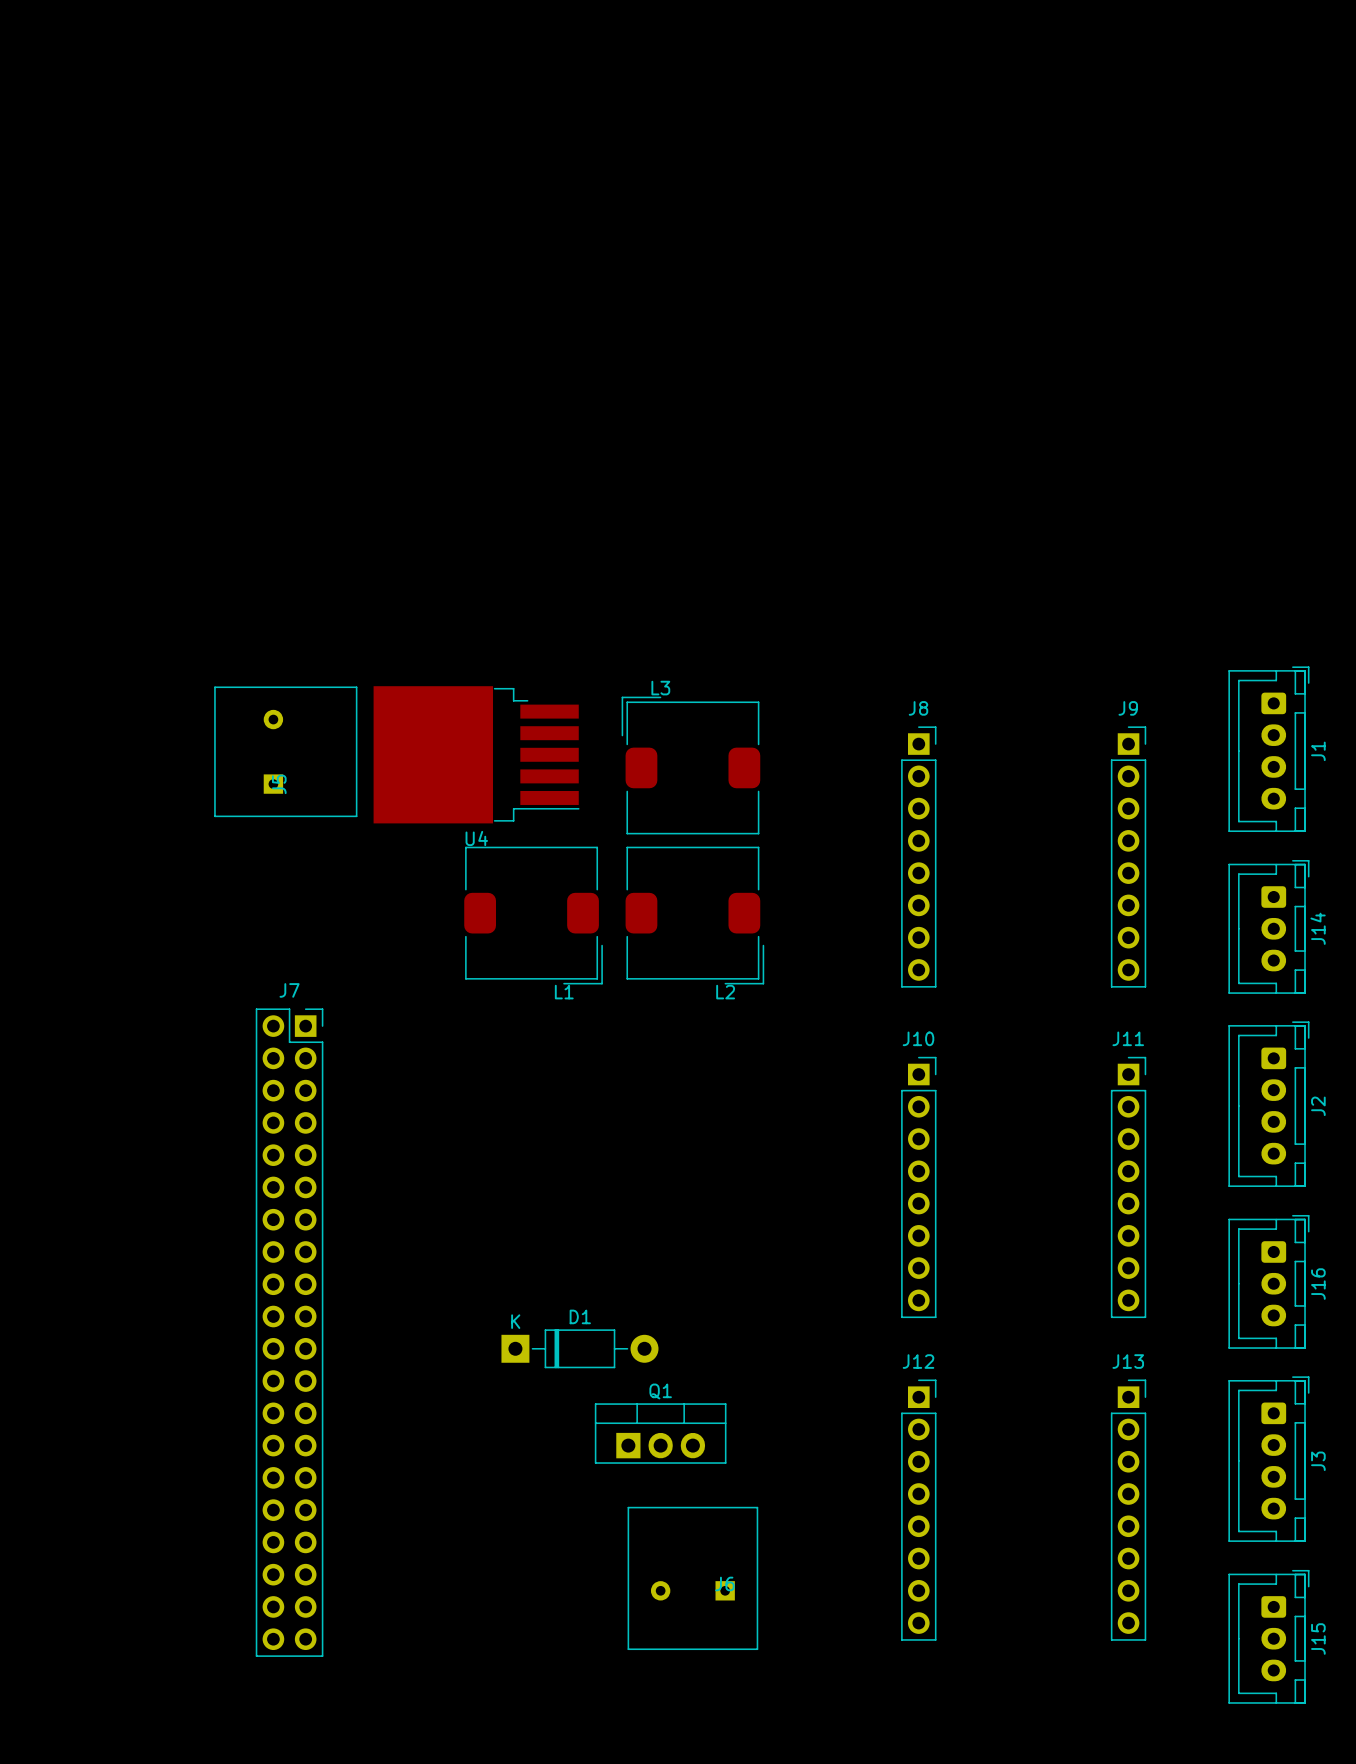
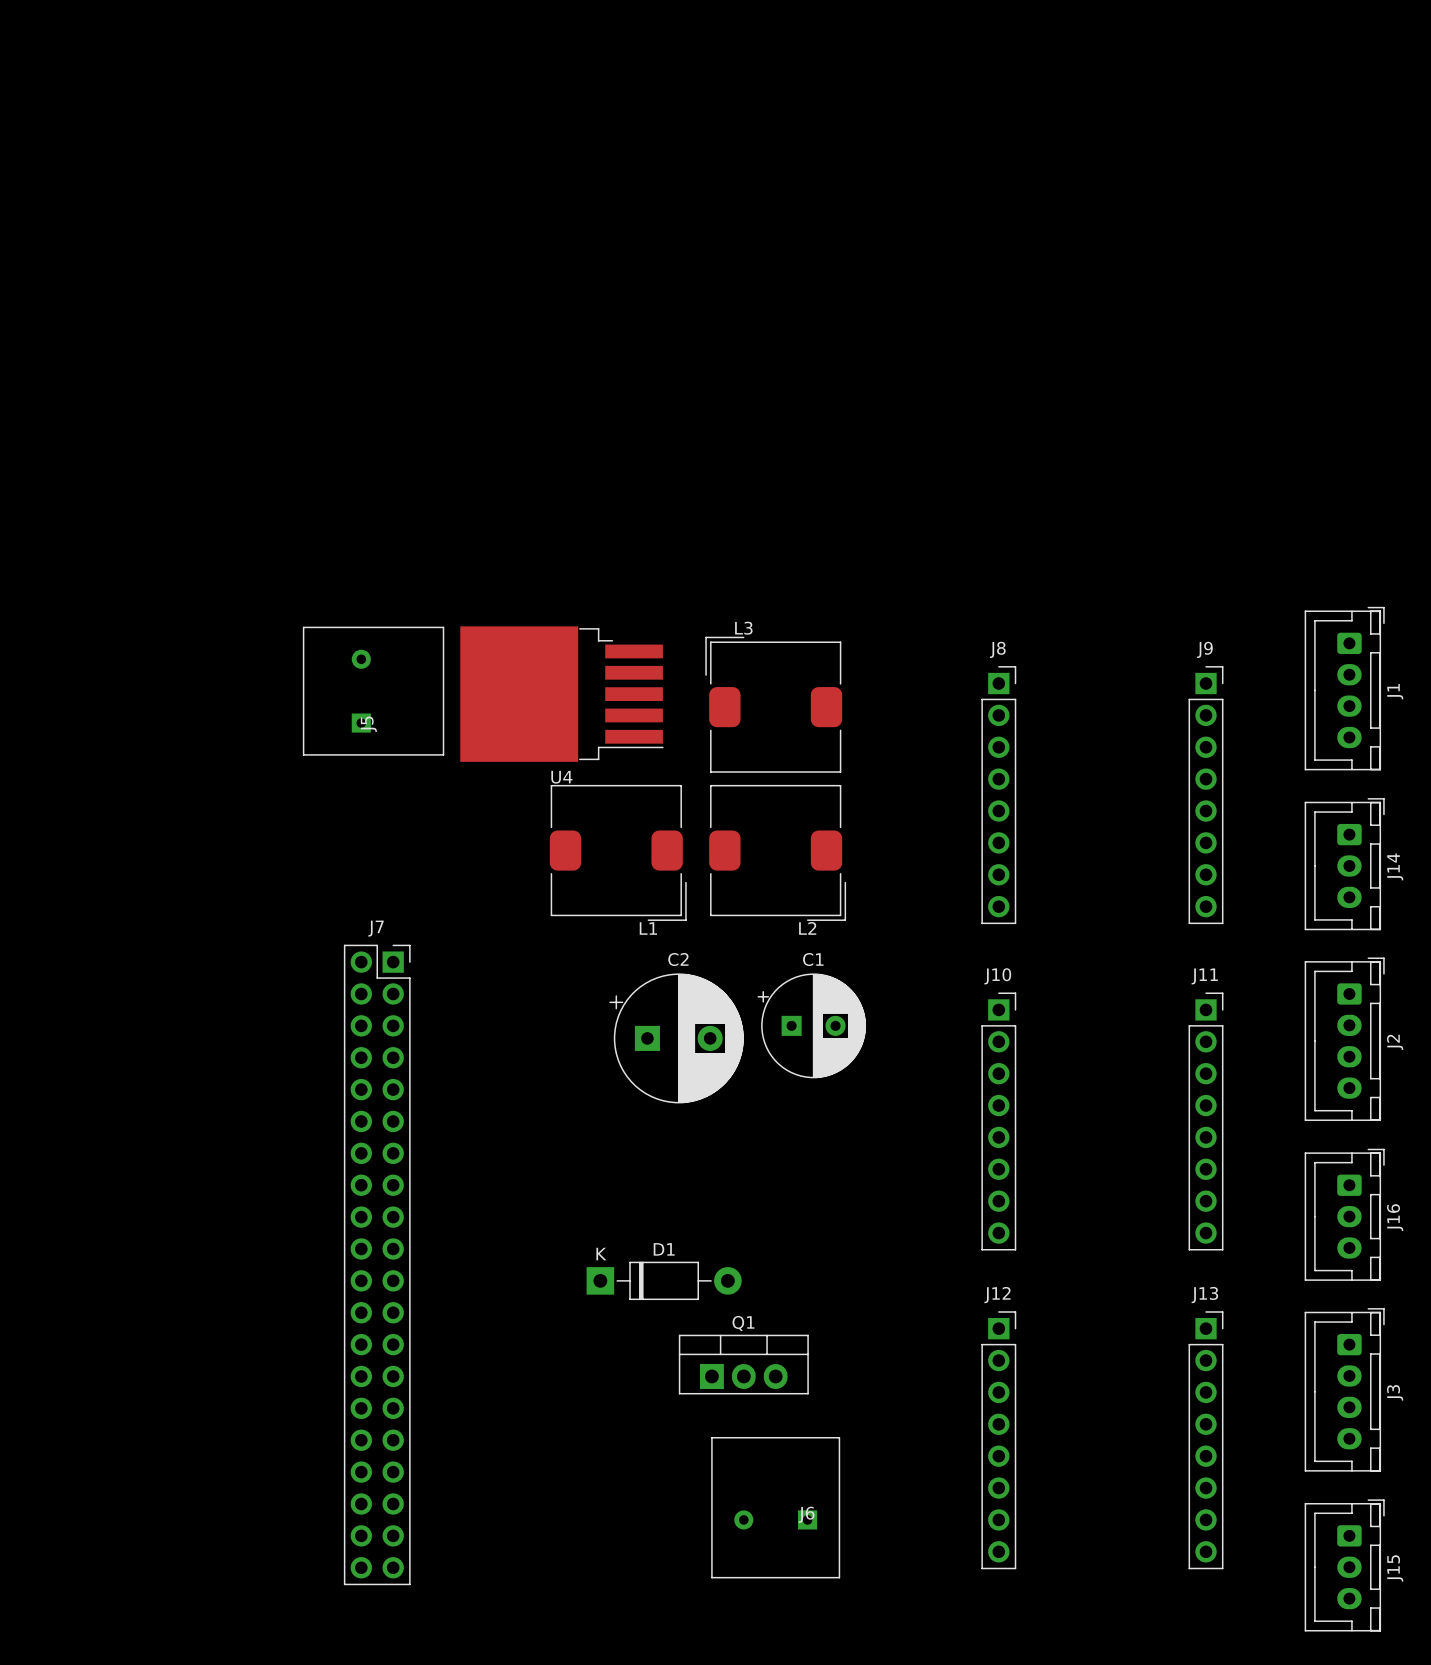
C1: none -> (811, 1025)
C2: none -> (676, 1038)

